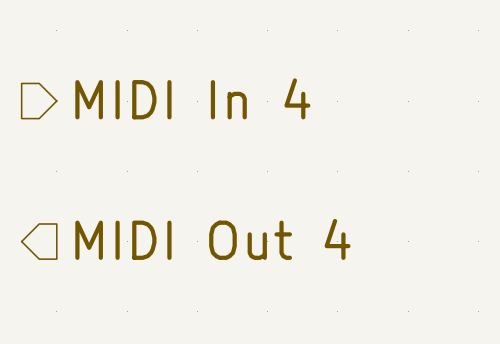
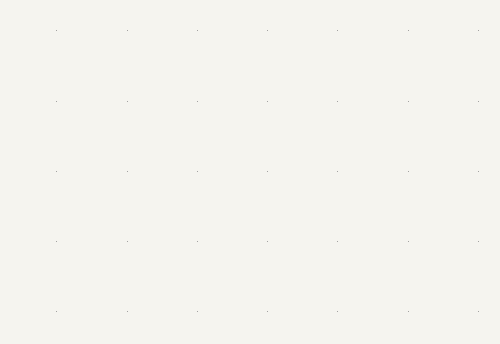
hierarchical label: MIDI In 4 (192, 98) -> none
hierarchical label: MIDI Out 4 (212, 239) -> none

